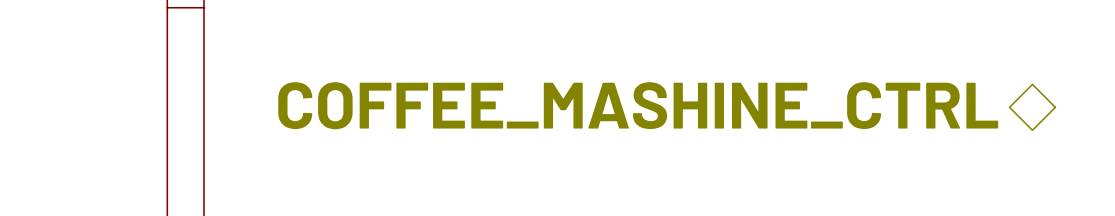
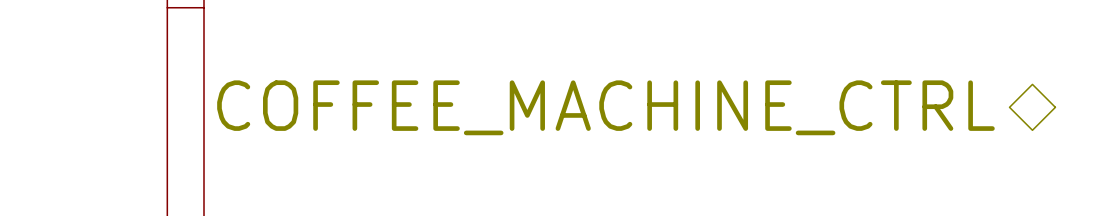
hierarchical label: COFFEE_MASHINE_CTRL (638, 105) -> COFFEE_MACHINE_CTRL (605, 107)

